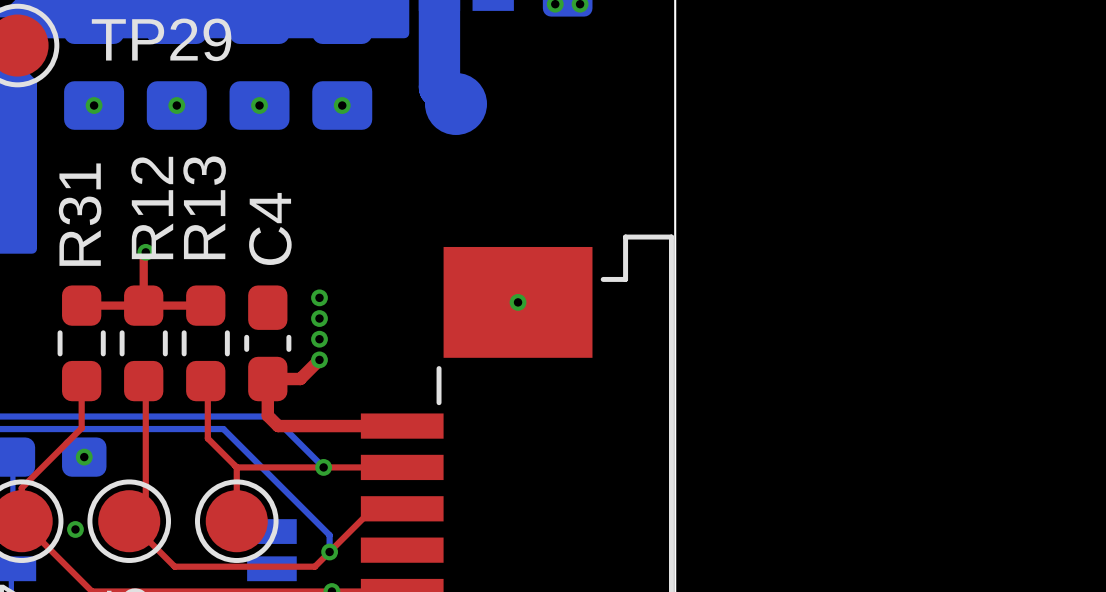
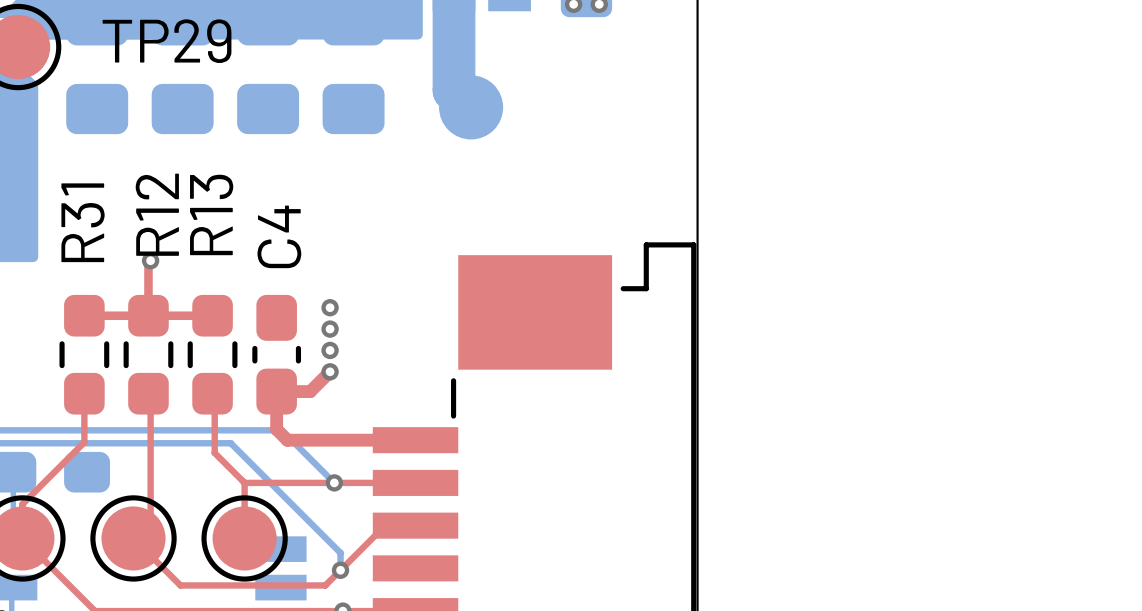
via: (94, 105) -> none
via: (176, 105) -> none
via: (259, 105) -> none
via: (342, 105) -> none
via: (518, 302) -> none
via: (84, 457) -> none
via: (75, 529) -> none

